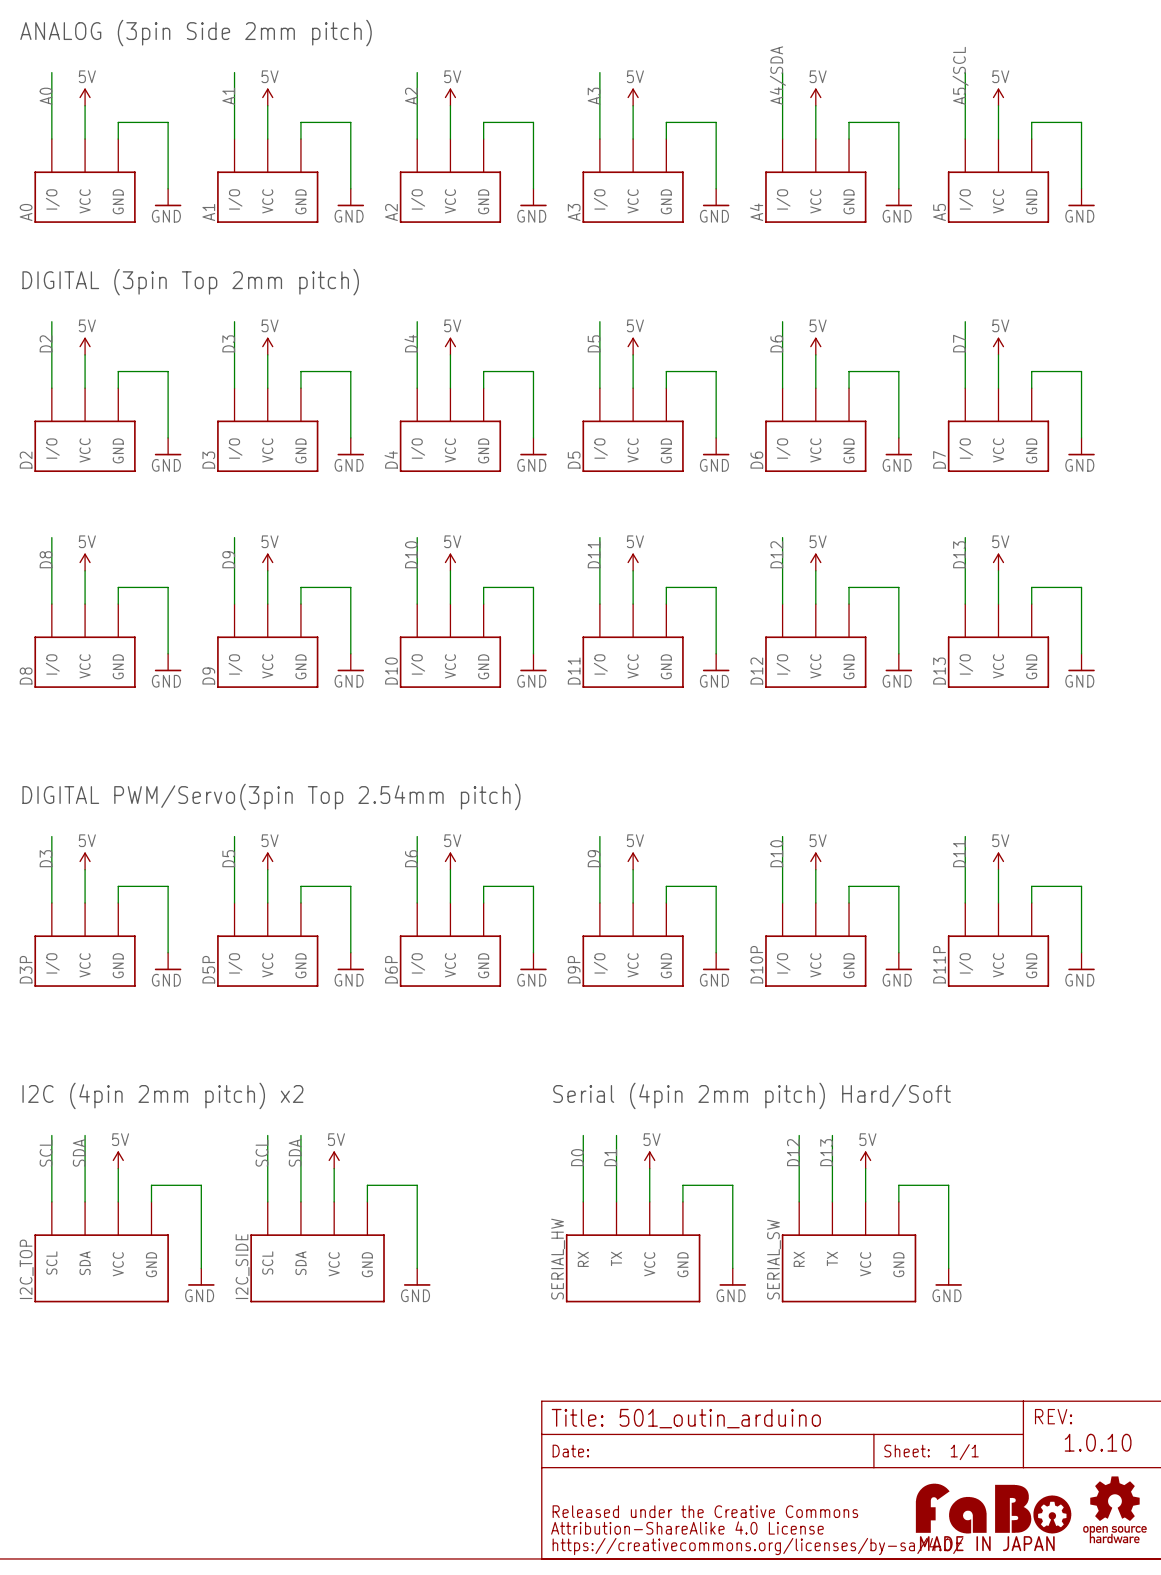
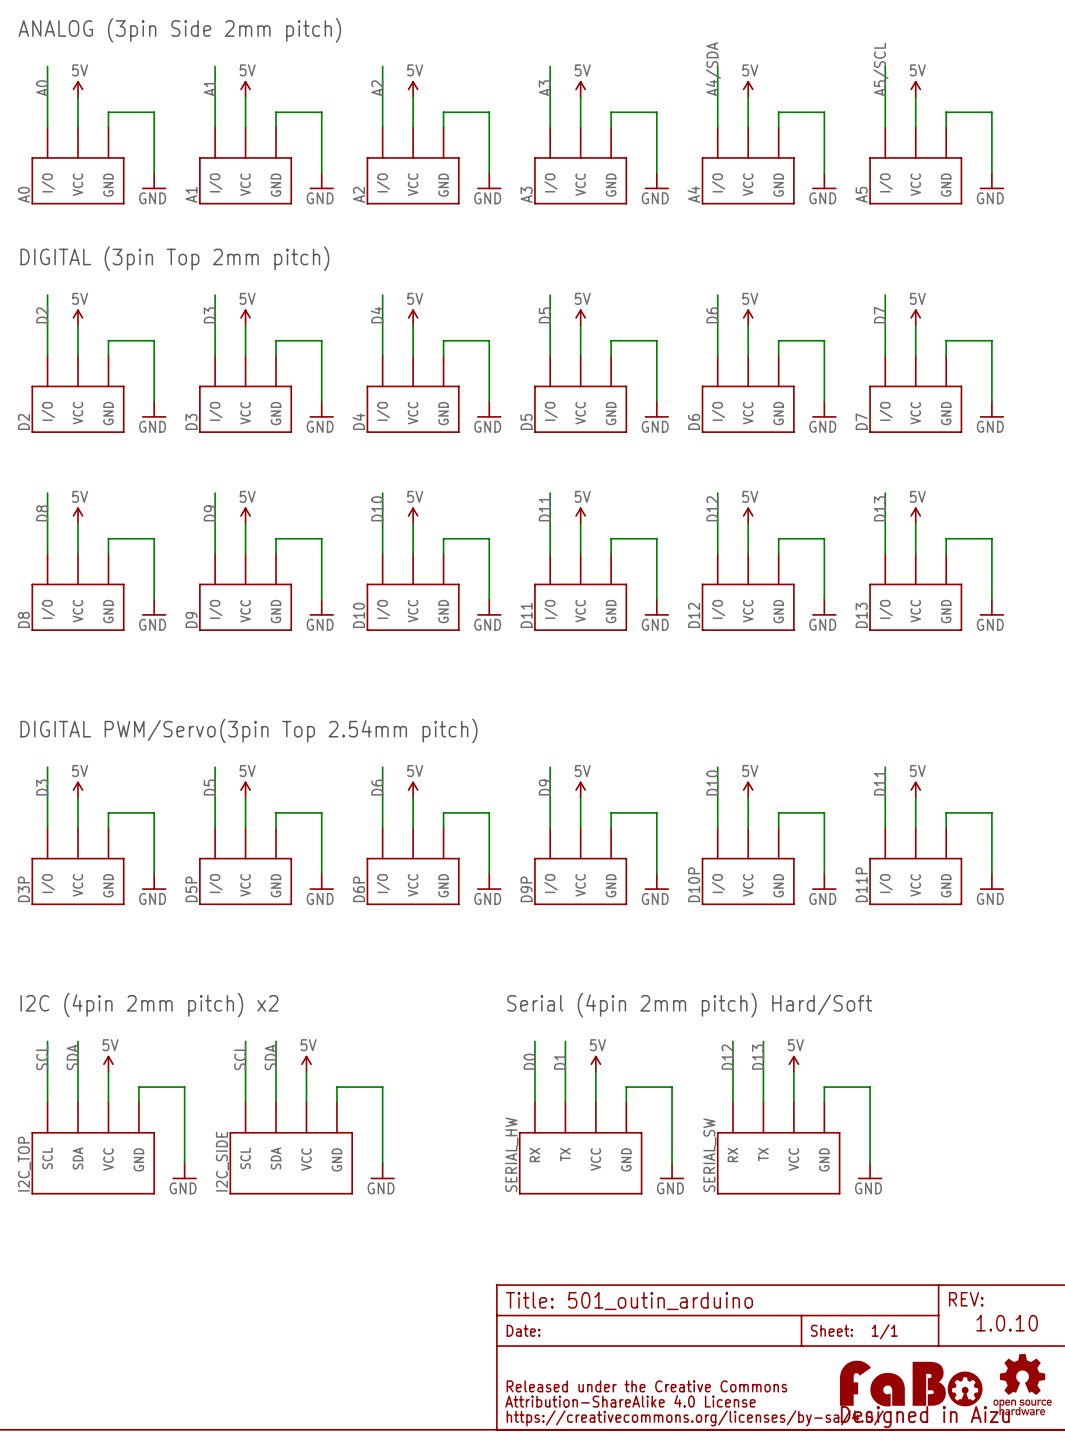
part text: MADE IN JAPAN (987, 1543) -> none
part text: none -> Designed in Aizu (925, 1417)

